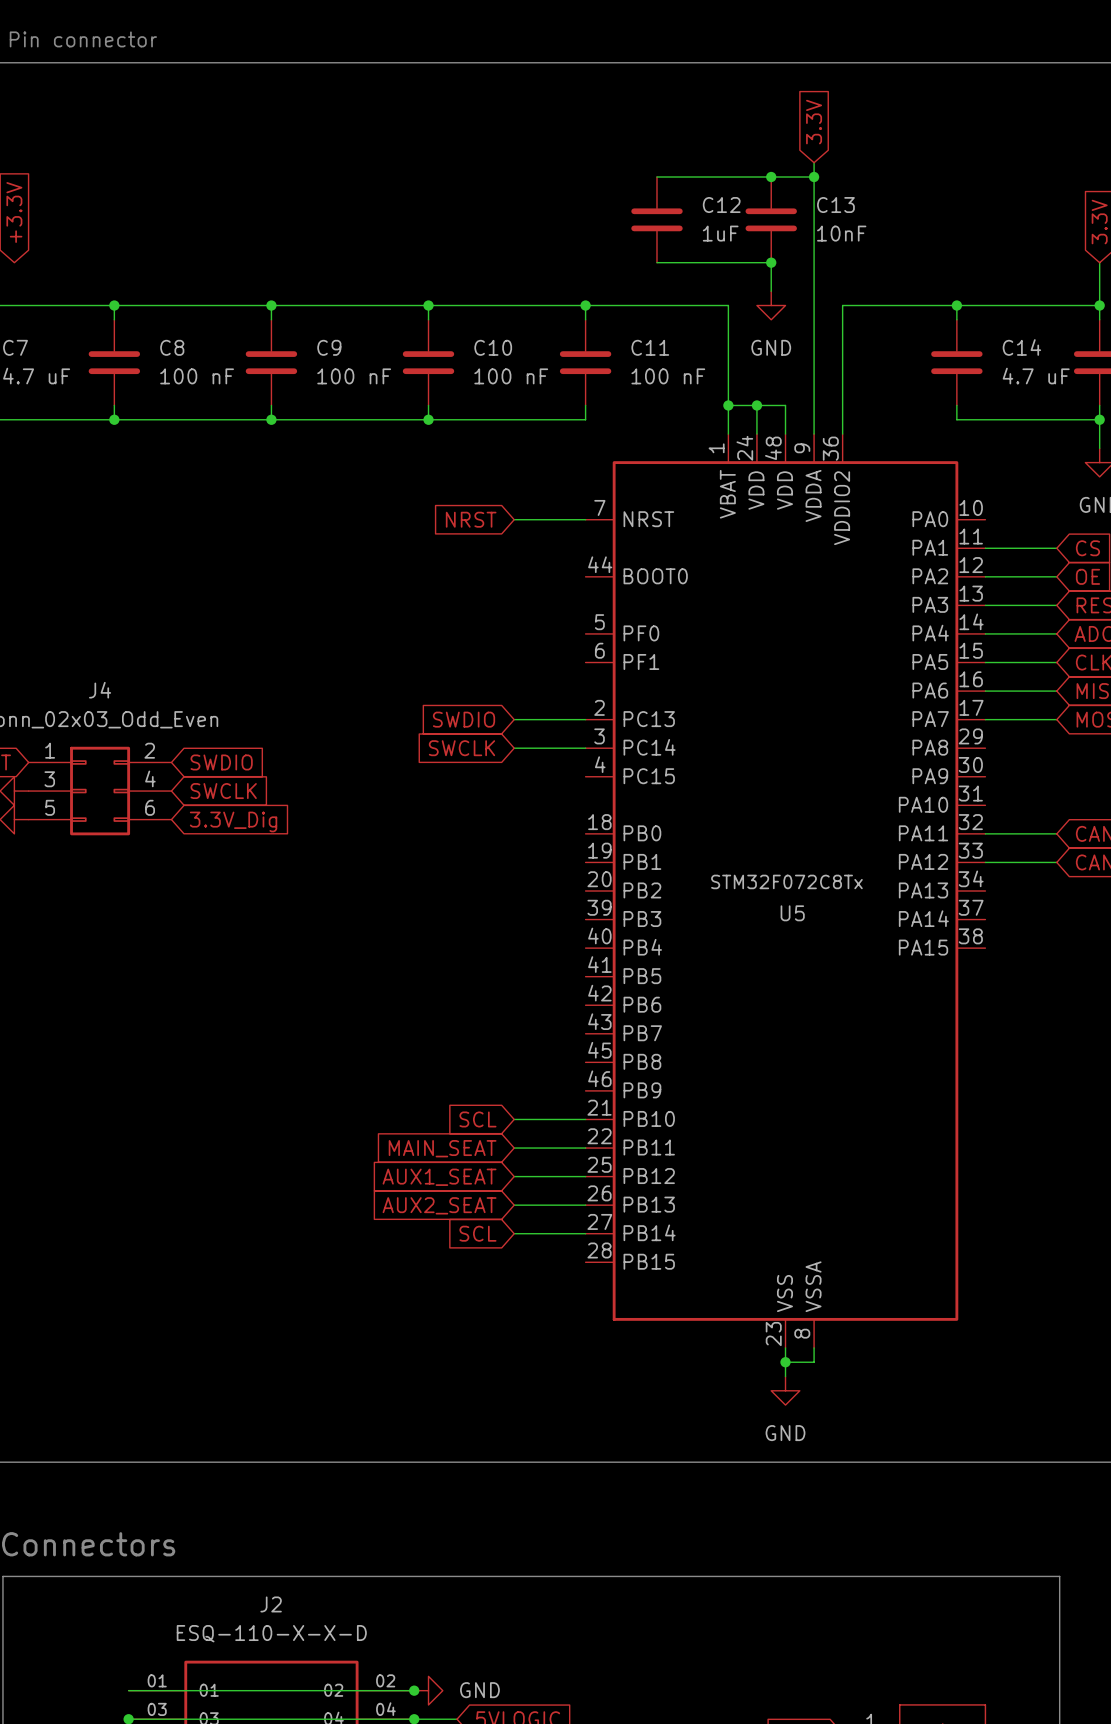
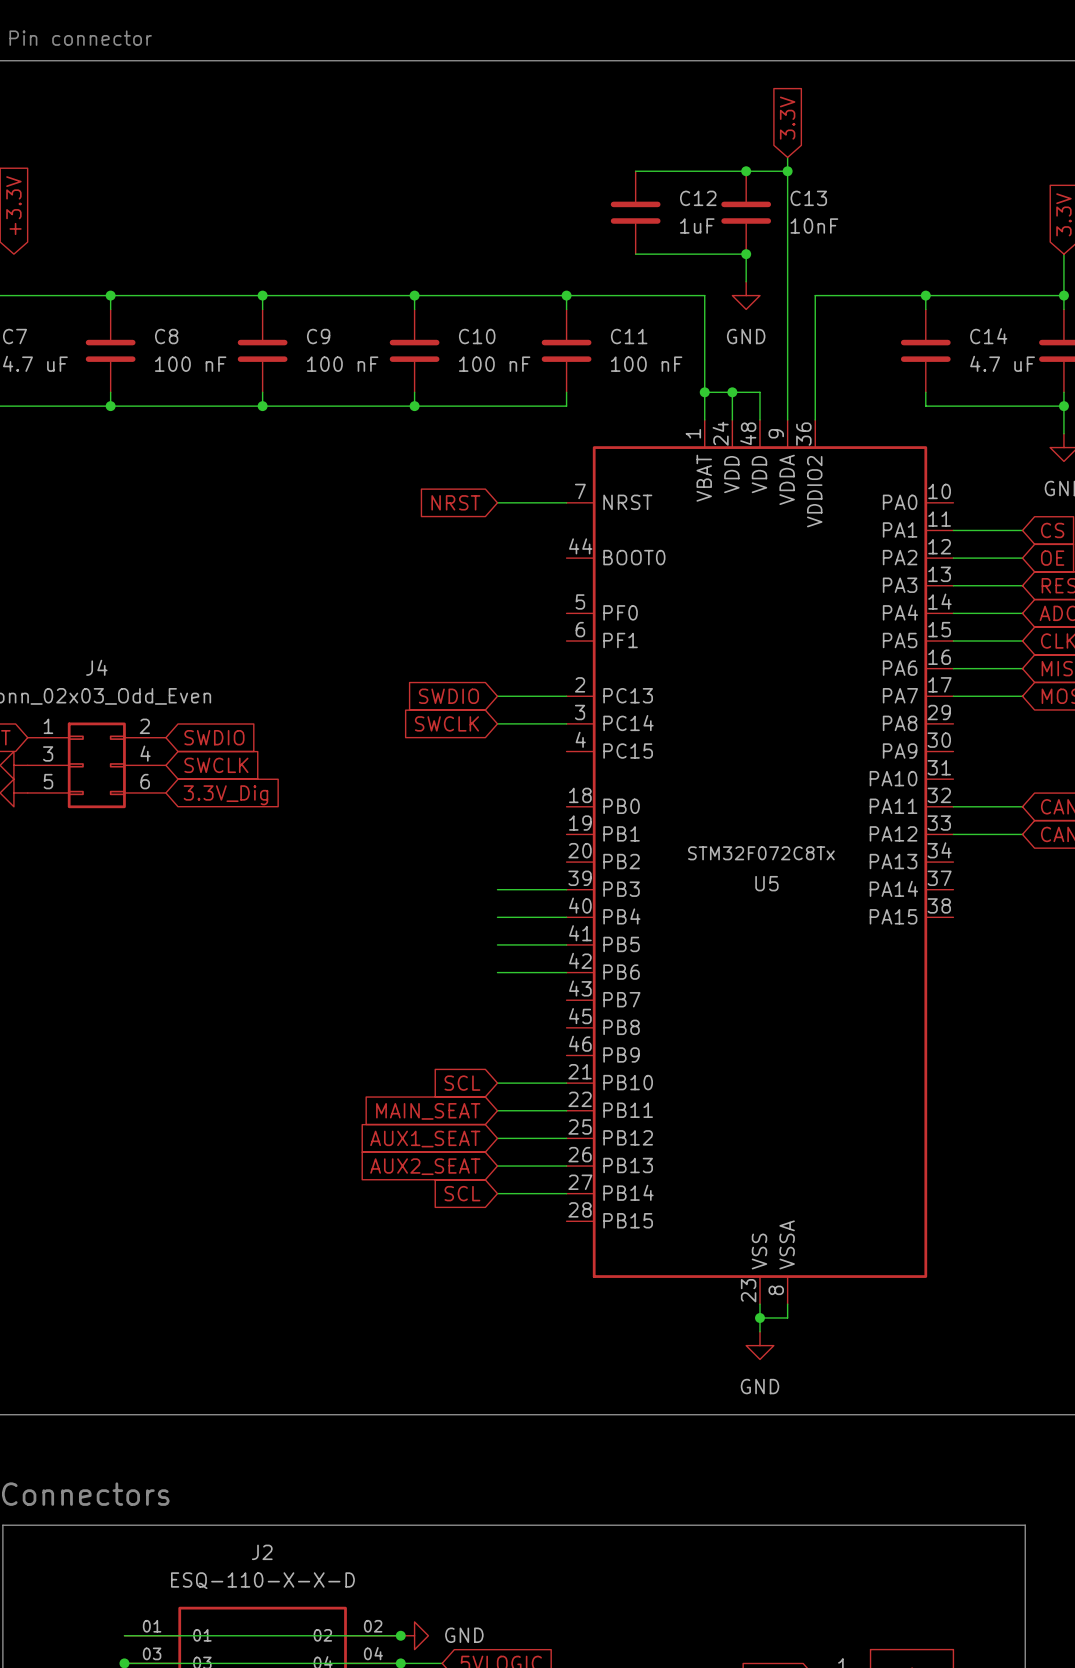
wire: none -> (497, 889) (566, 889)
wire: none -> (497, 917) (566, 917)
wire: none -> (497, 944) (566, 944)
wire: none -> (497, 972) (566, 972)

